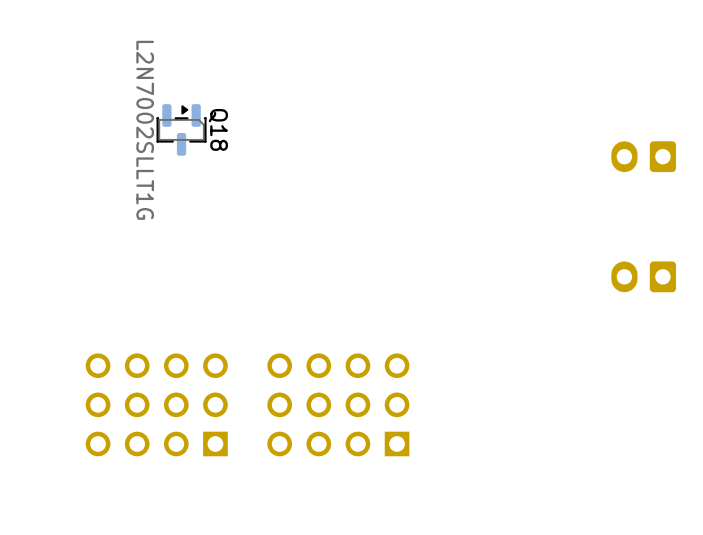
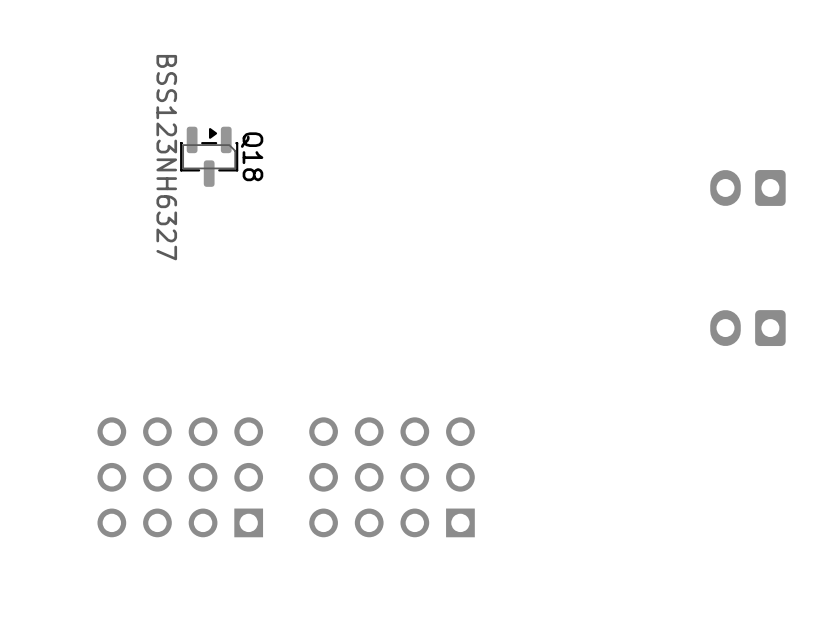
Q18 value: L2N7002SLLT1G (145, 130) -> BSS123NH6327 (166, 157)

